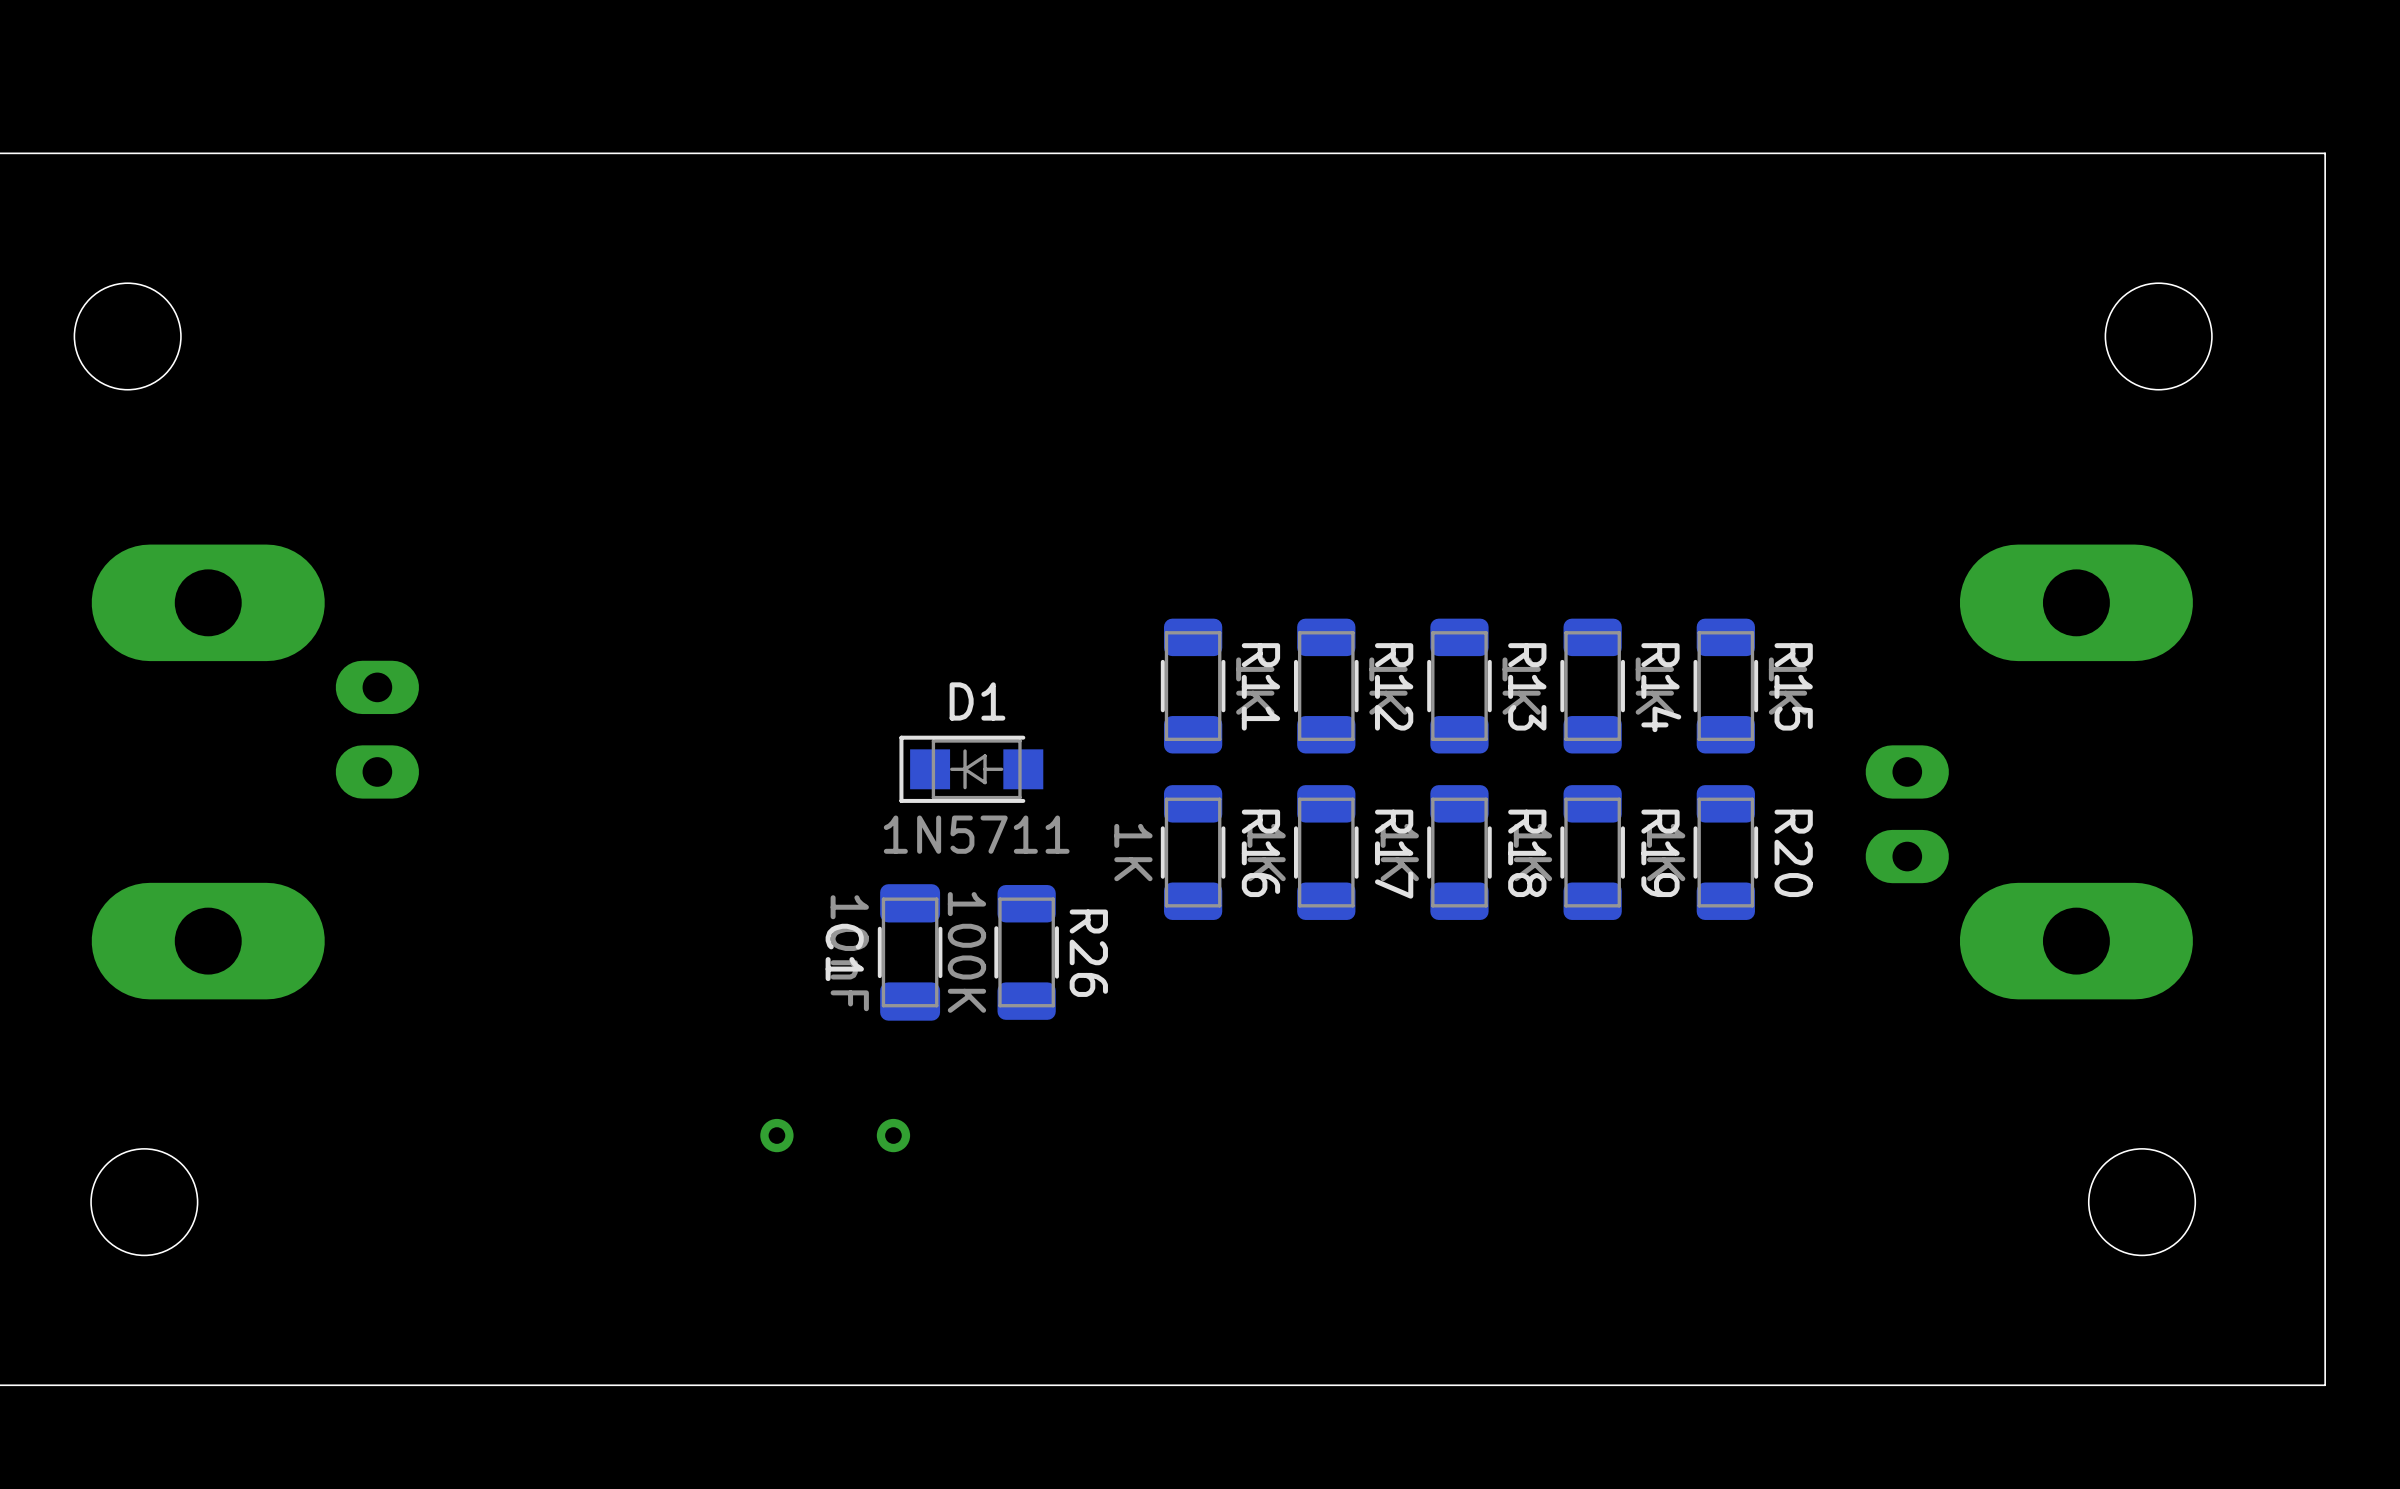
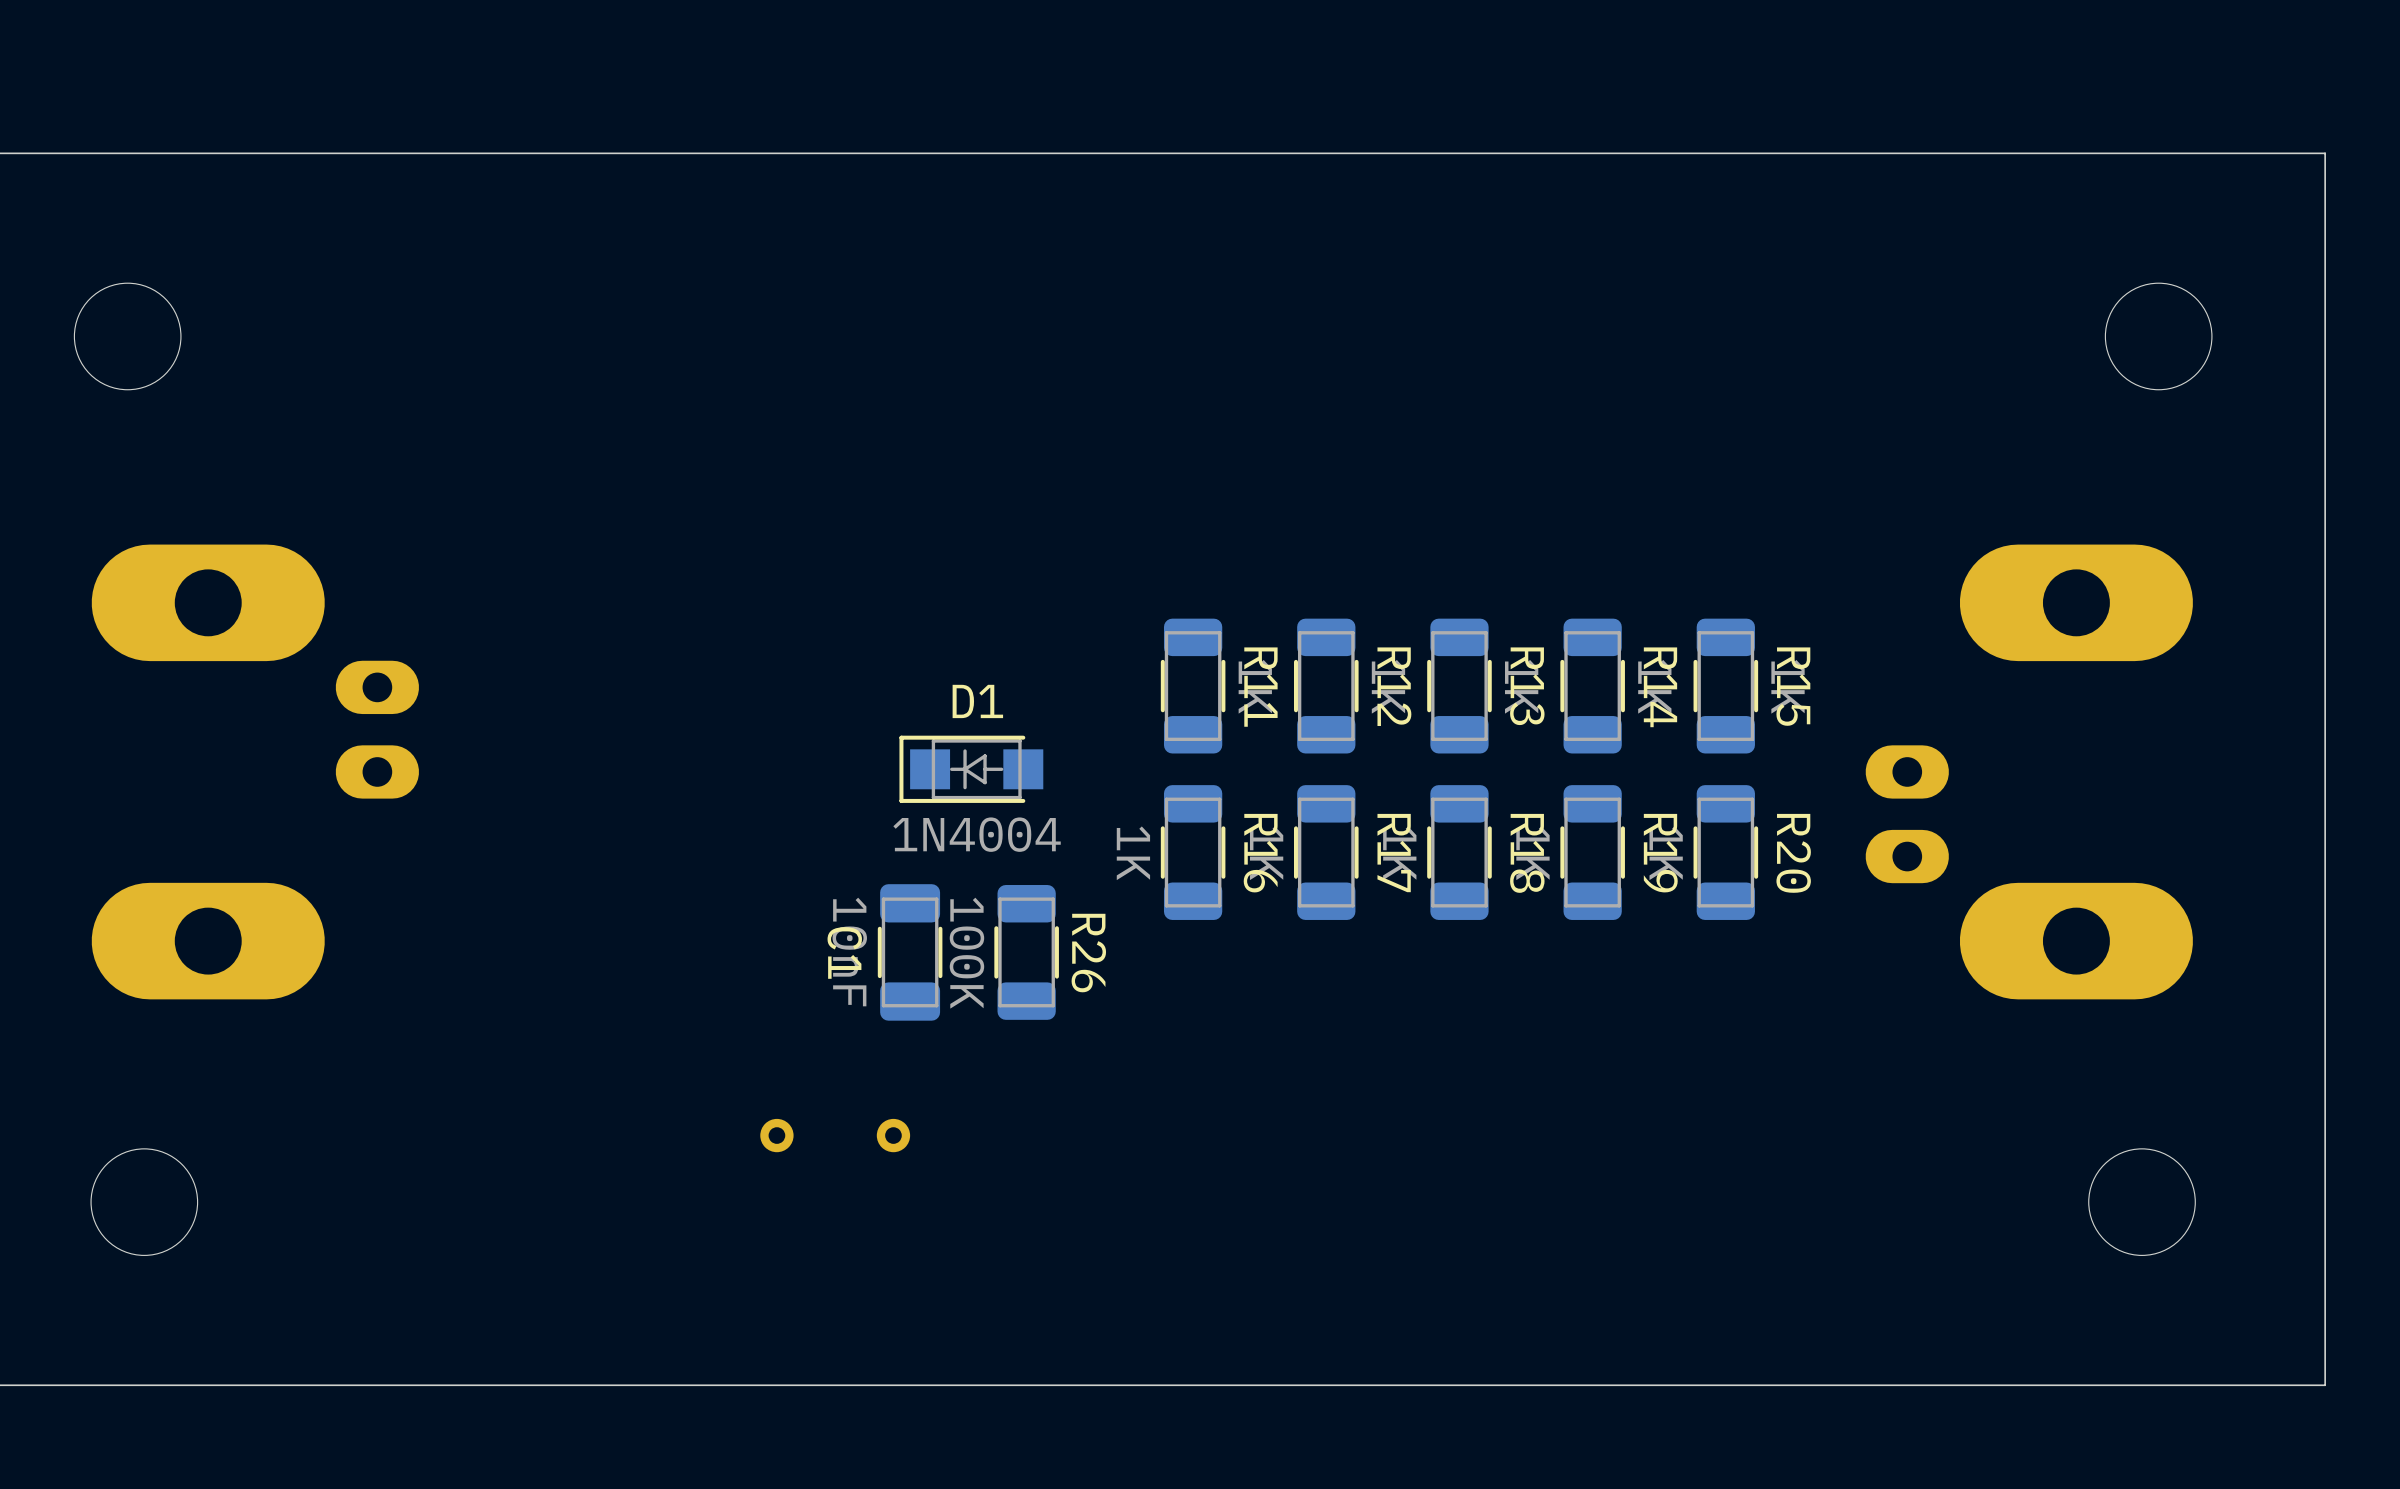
D1 value: 1N5711 (976, 834) -> 1N4004 (977, 834)

